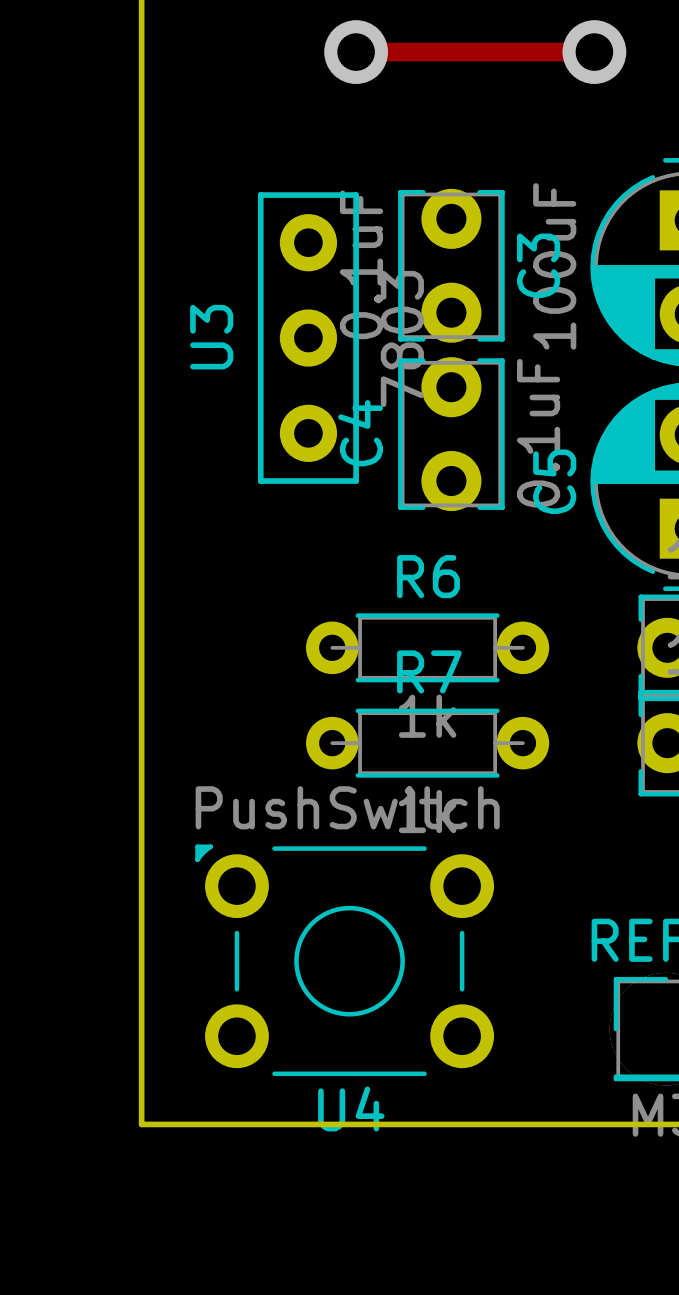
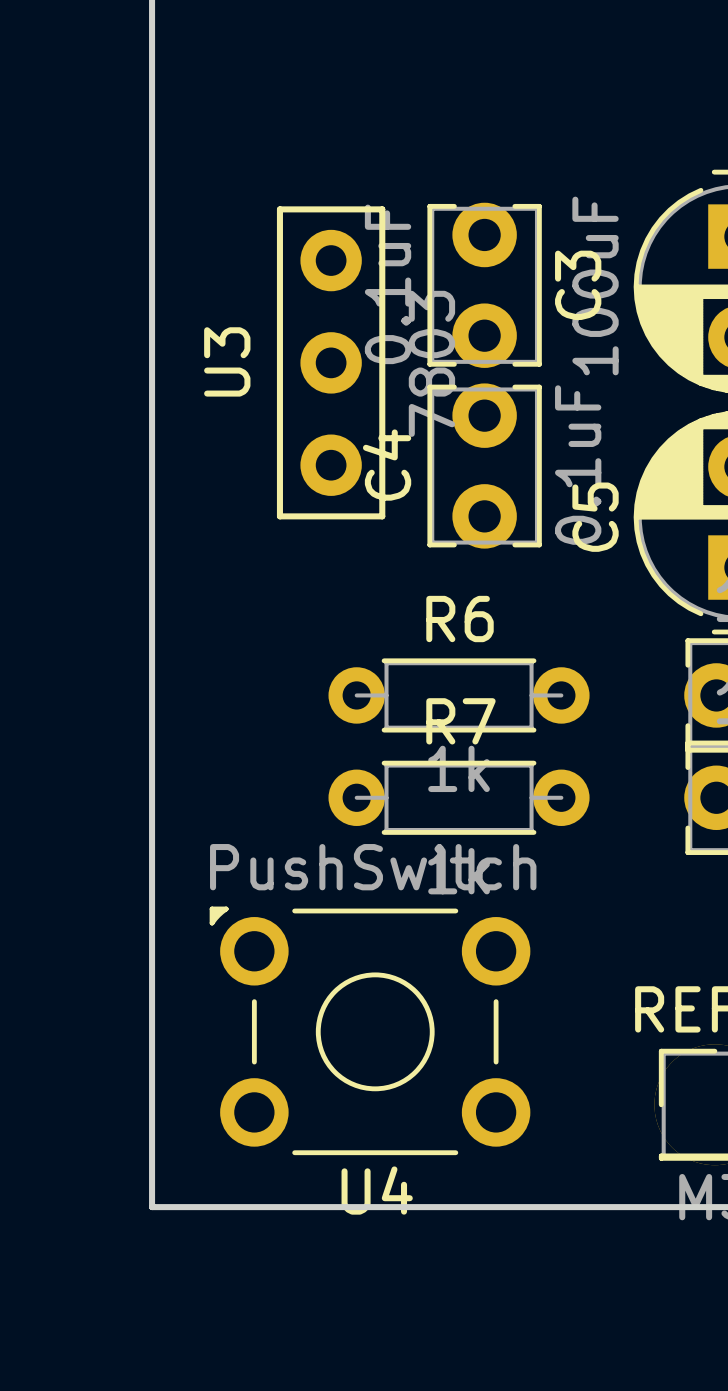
track: (356, 52) (594, 52) -> none
via: (356, 52) -> none
via: (594, 52) -> none

